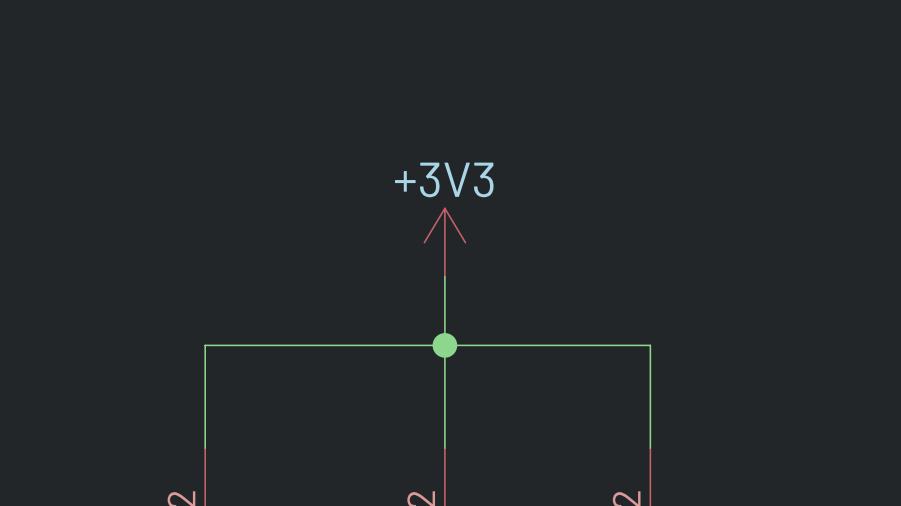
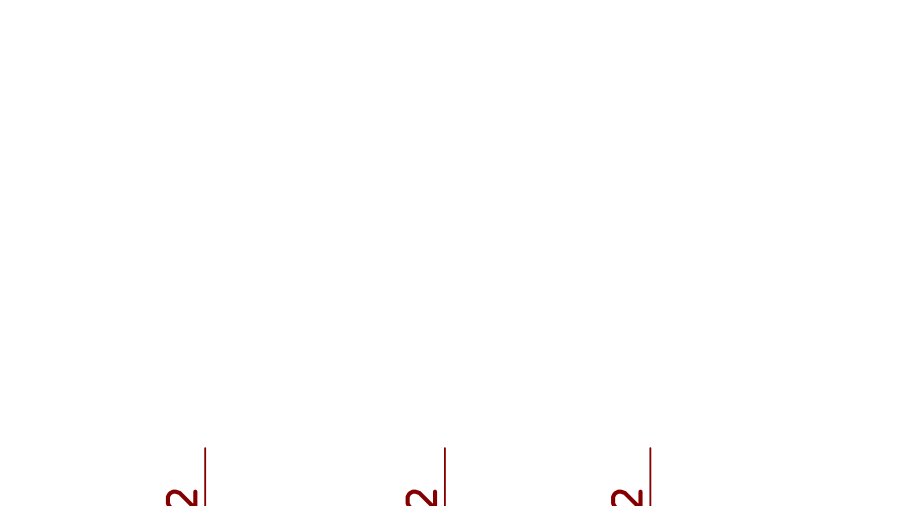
power symbol: +3V3 (444, 242) -> none
wire: (444, 276) (444, 448) -> none
junction: (444, 345) -> none
wire: (205, 448) (205, 345) (650, 345) (650, 448) -> none

